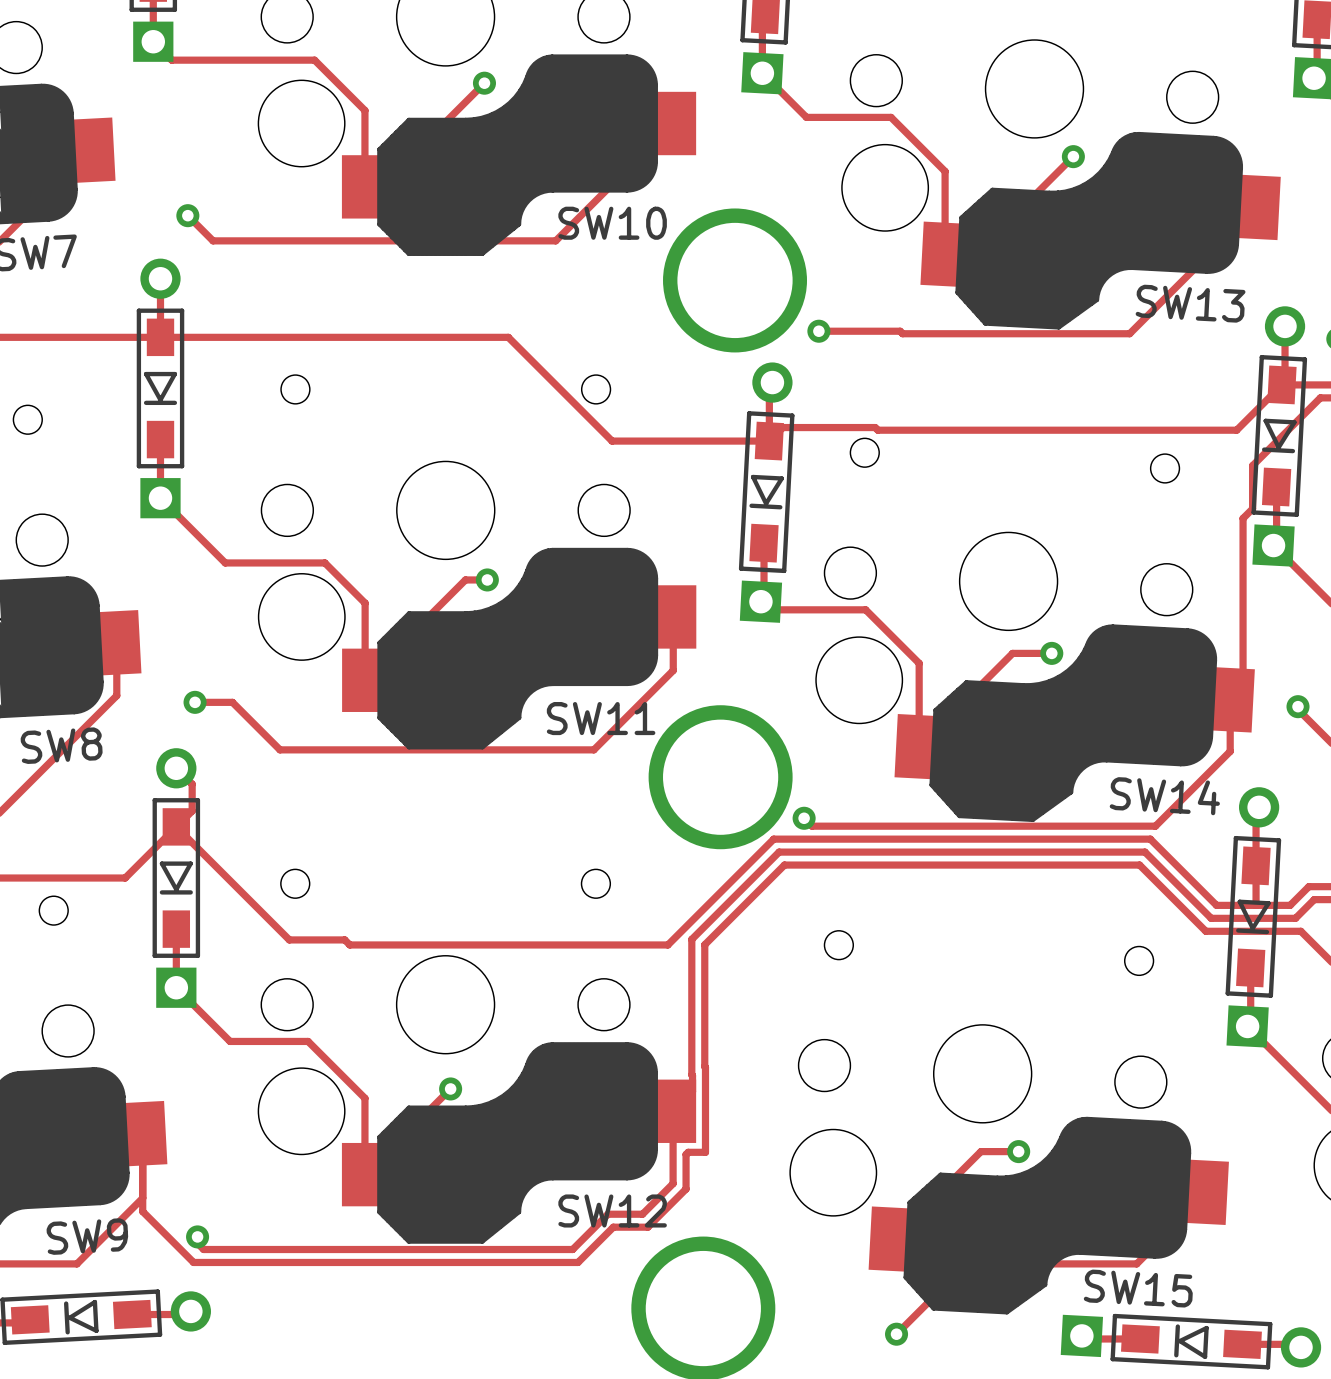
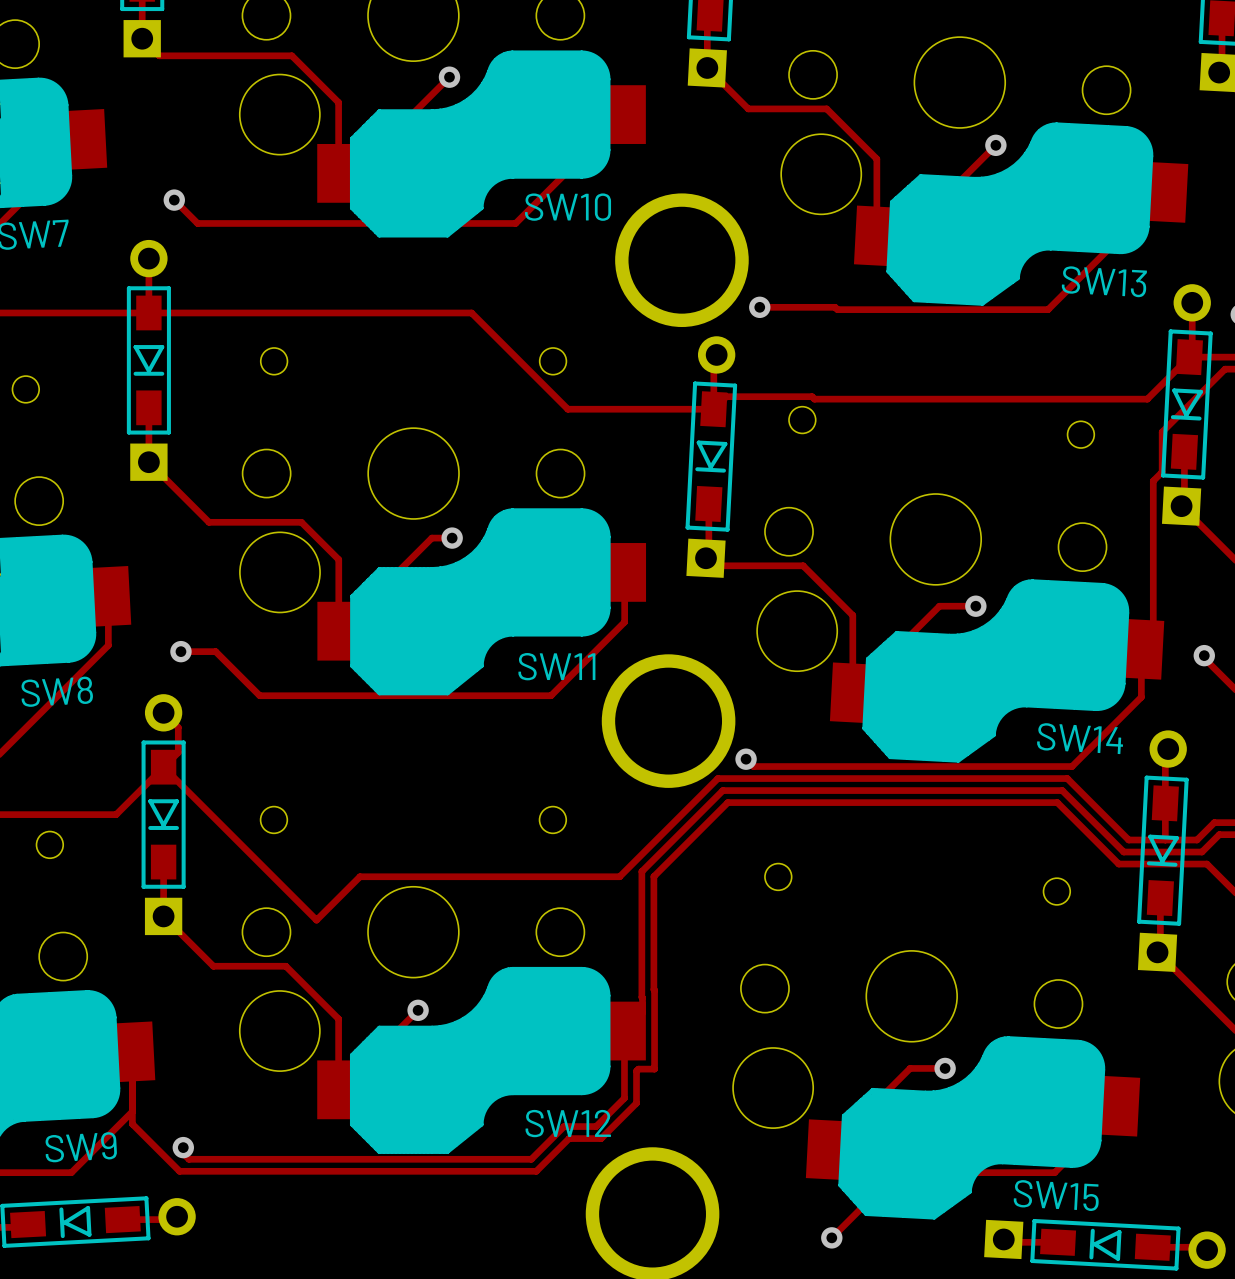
track: (289, 939) (344, 939) (349, 944) (387, 944) -> (268, 872) (316, 920) (359, 876)

